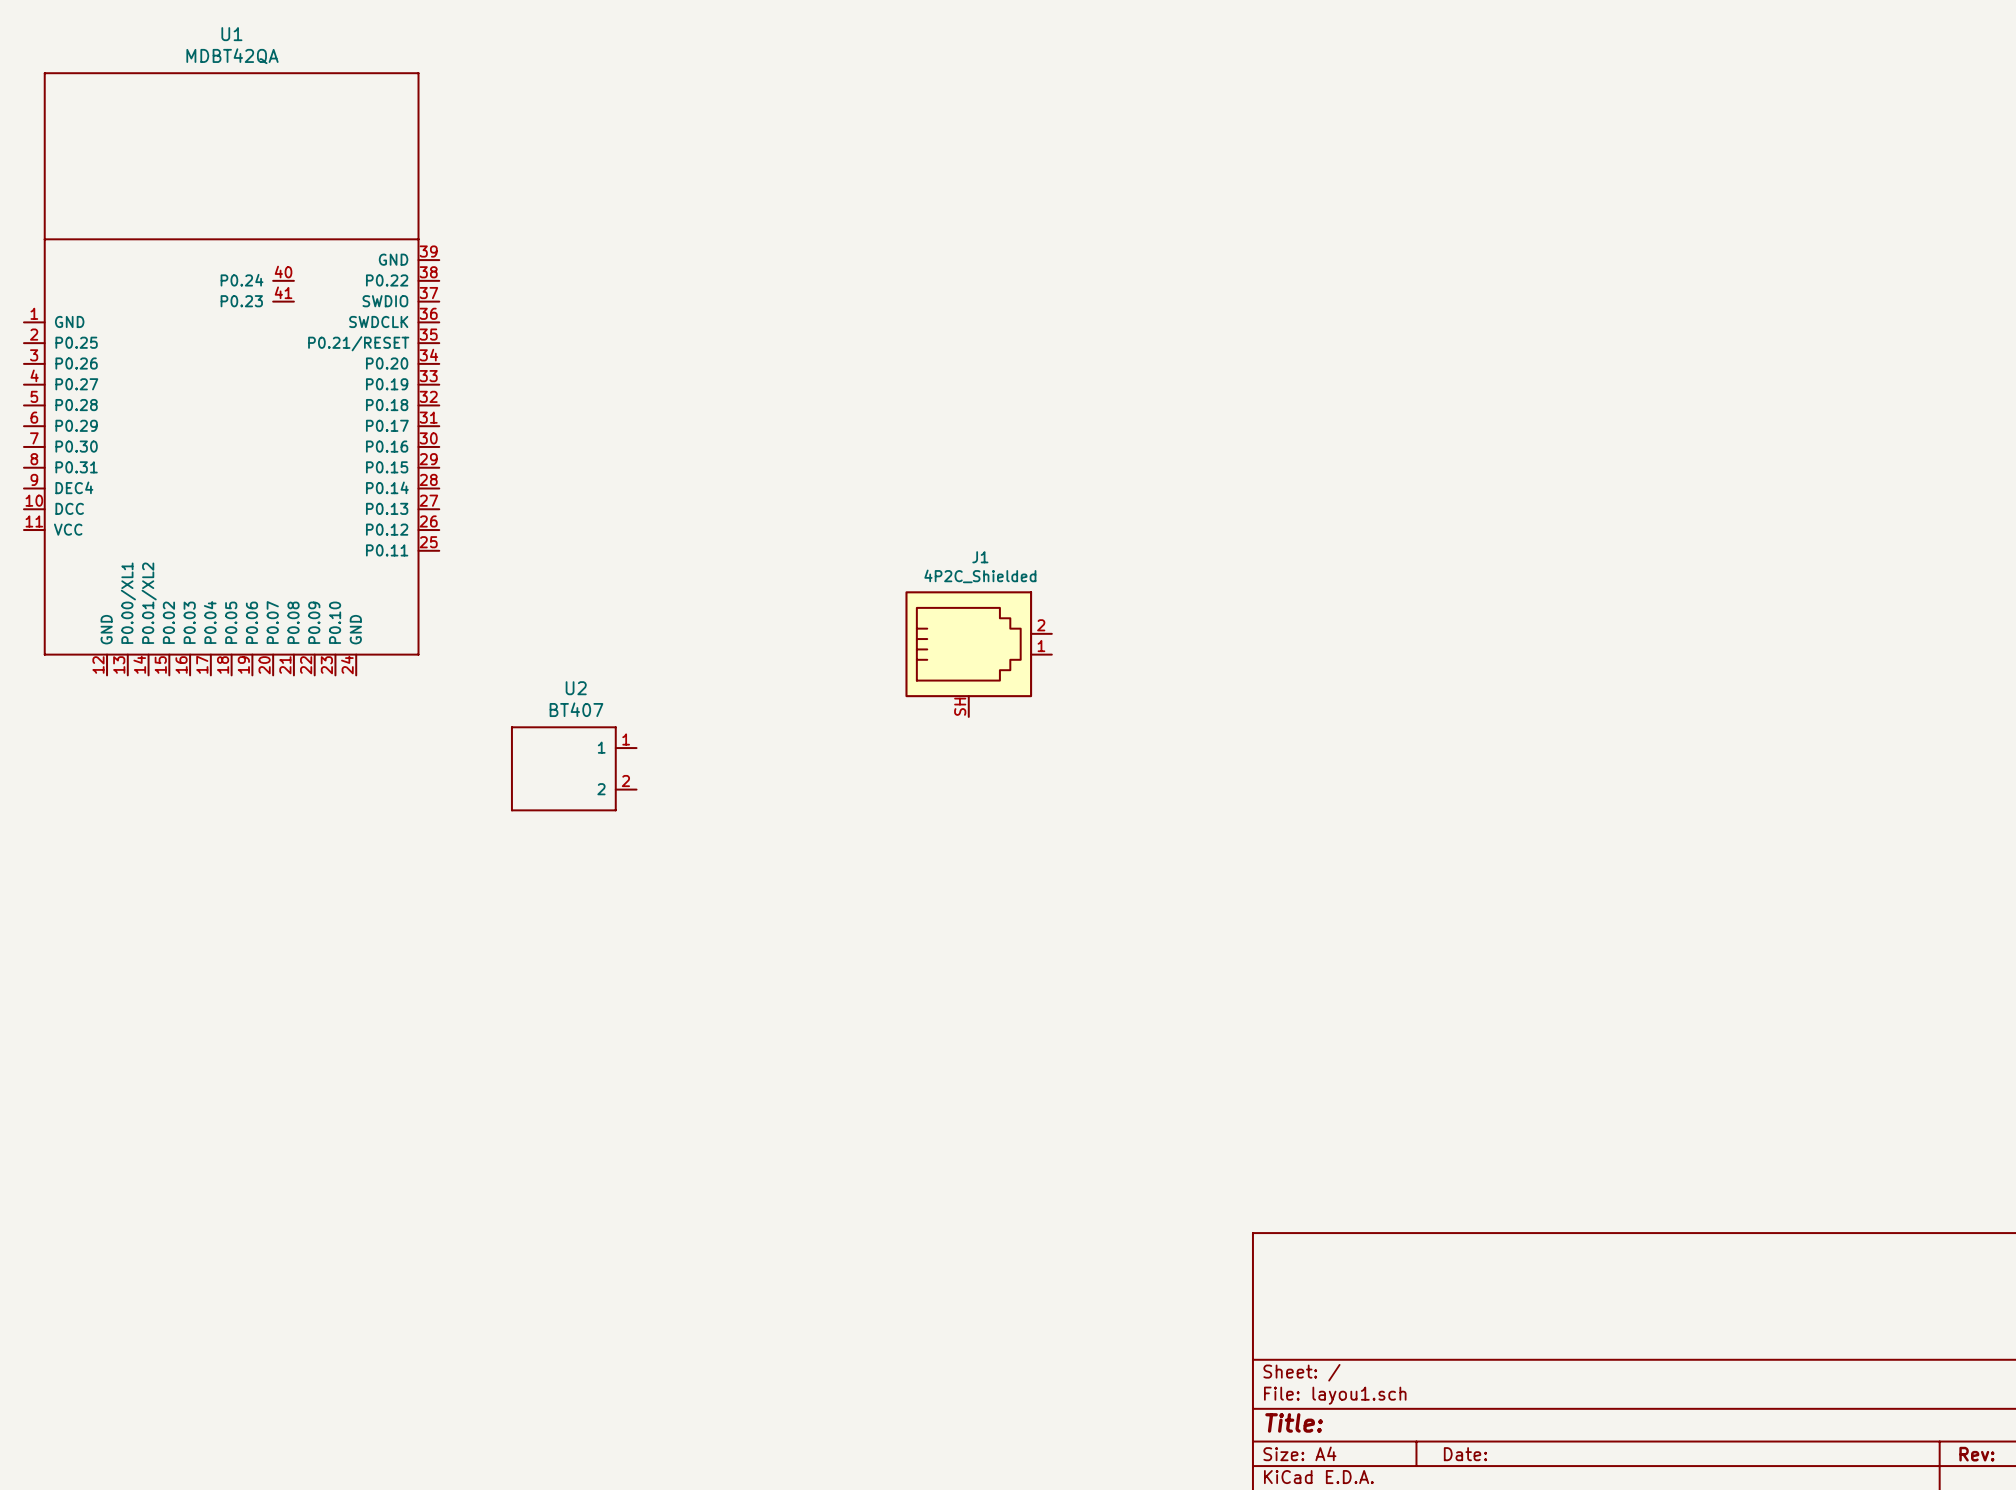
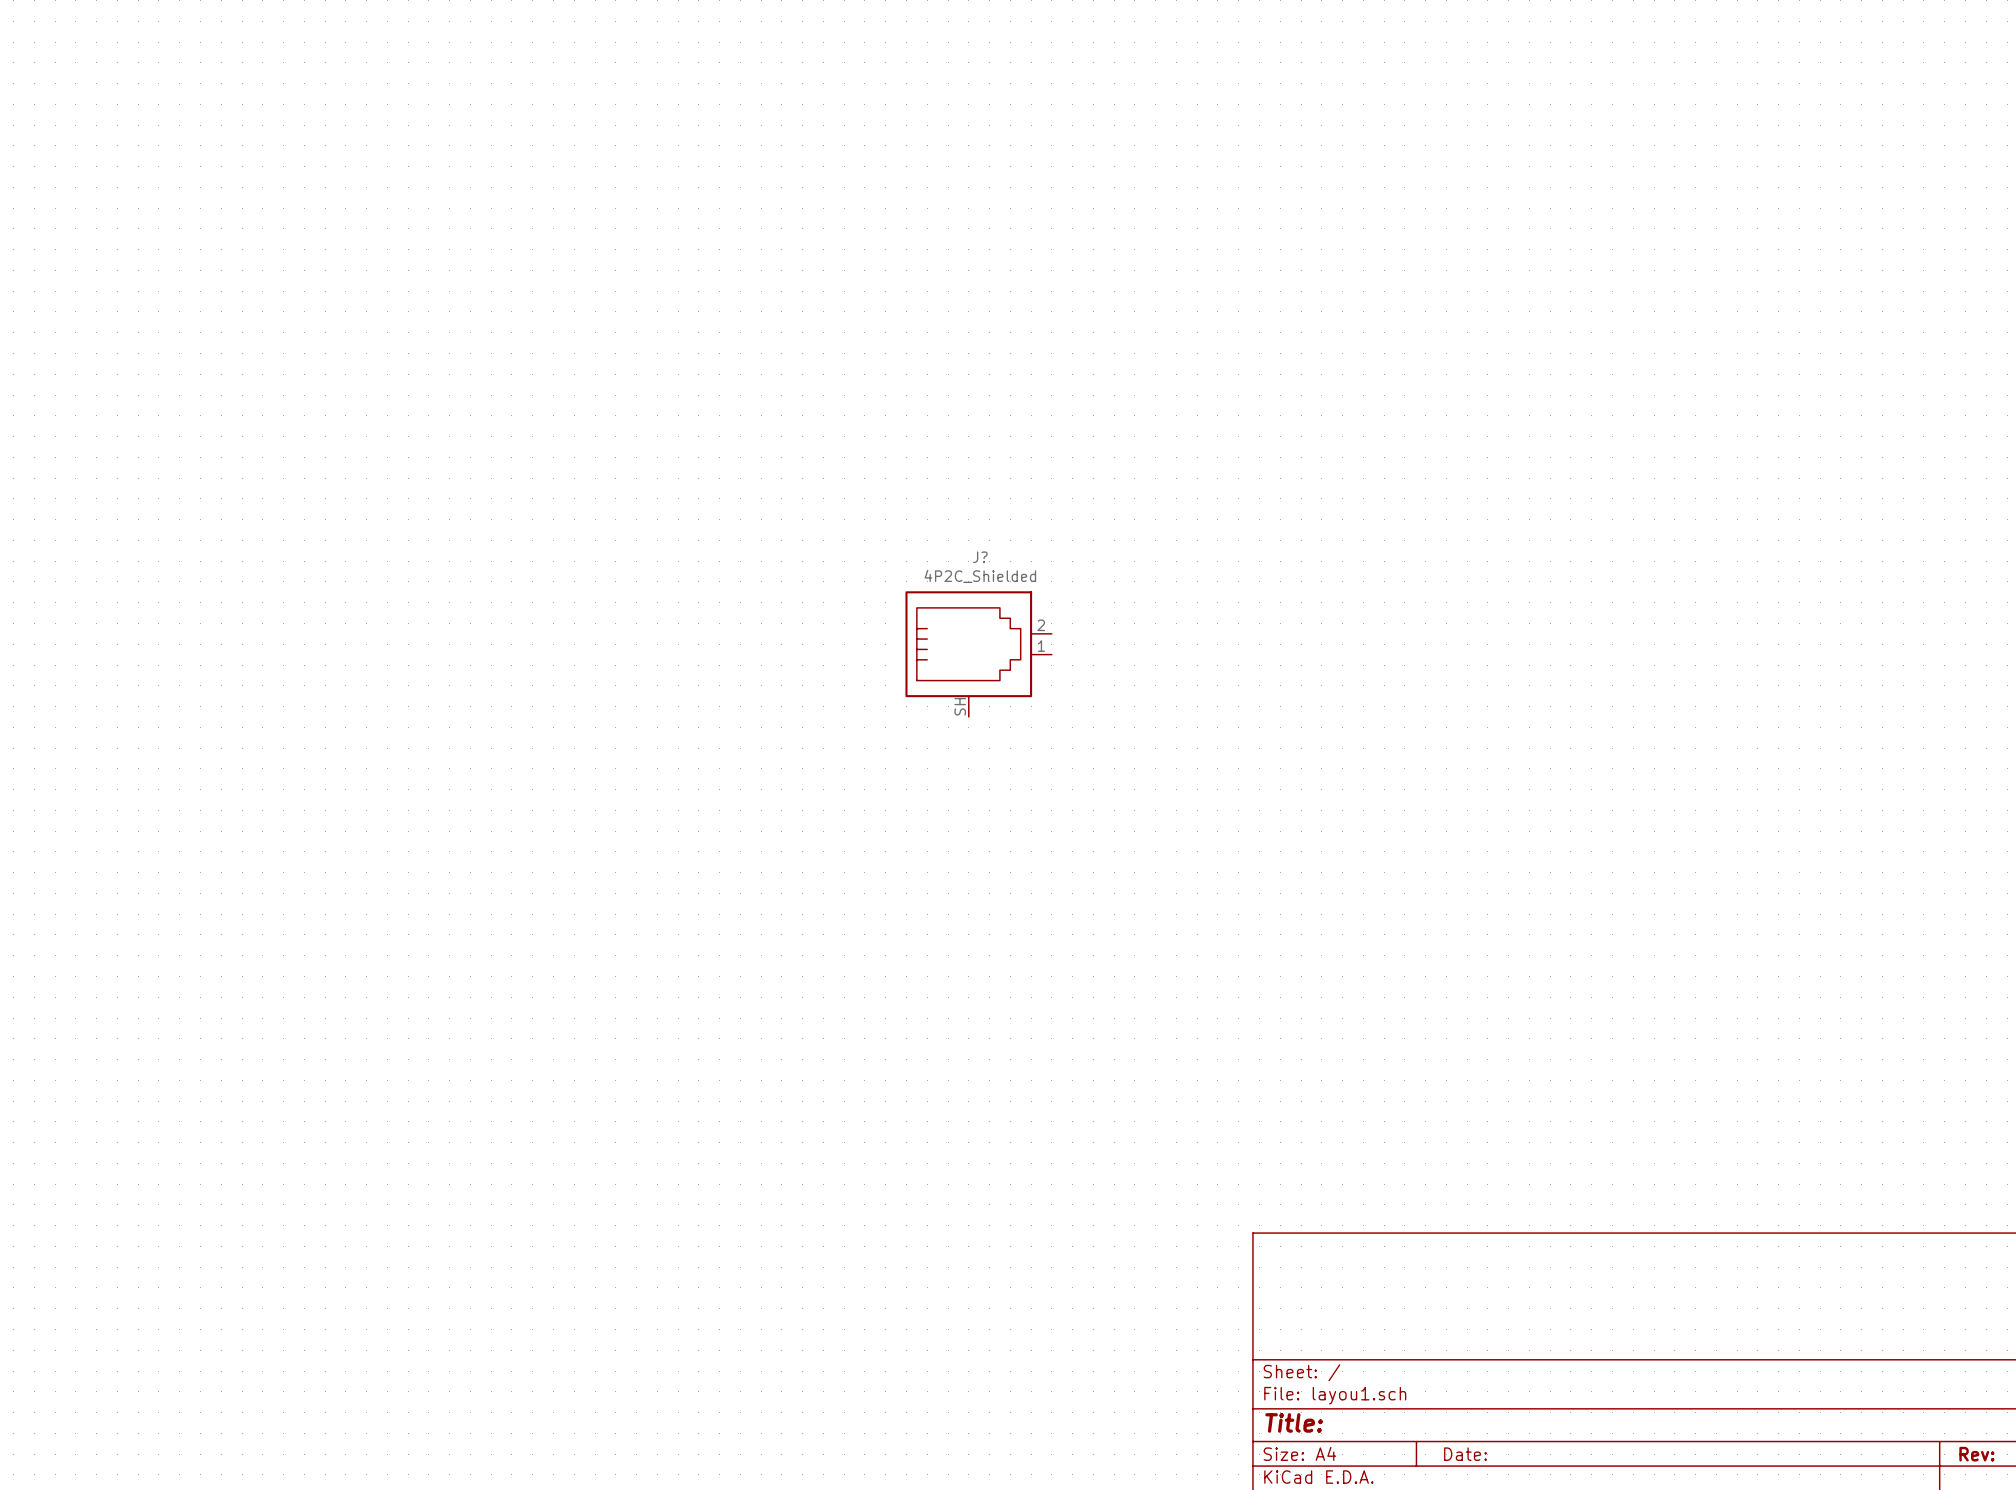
U1: MDBT42QA (231, 374) -> none
J1 name: J1 (980, 557) -> J? (980, 557)
U2: BT407 (574, 768) -> none

